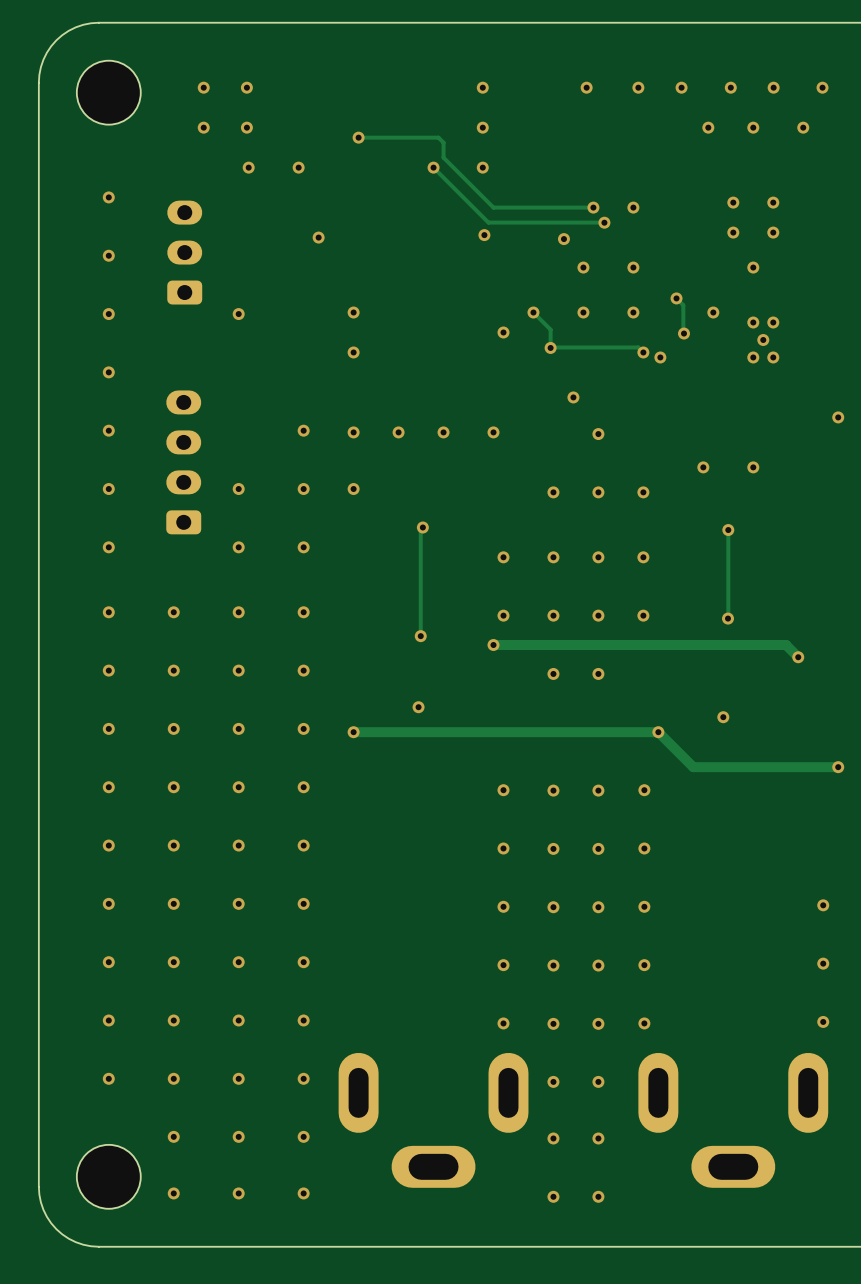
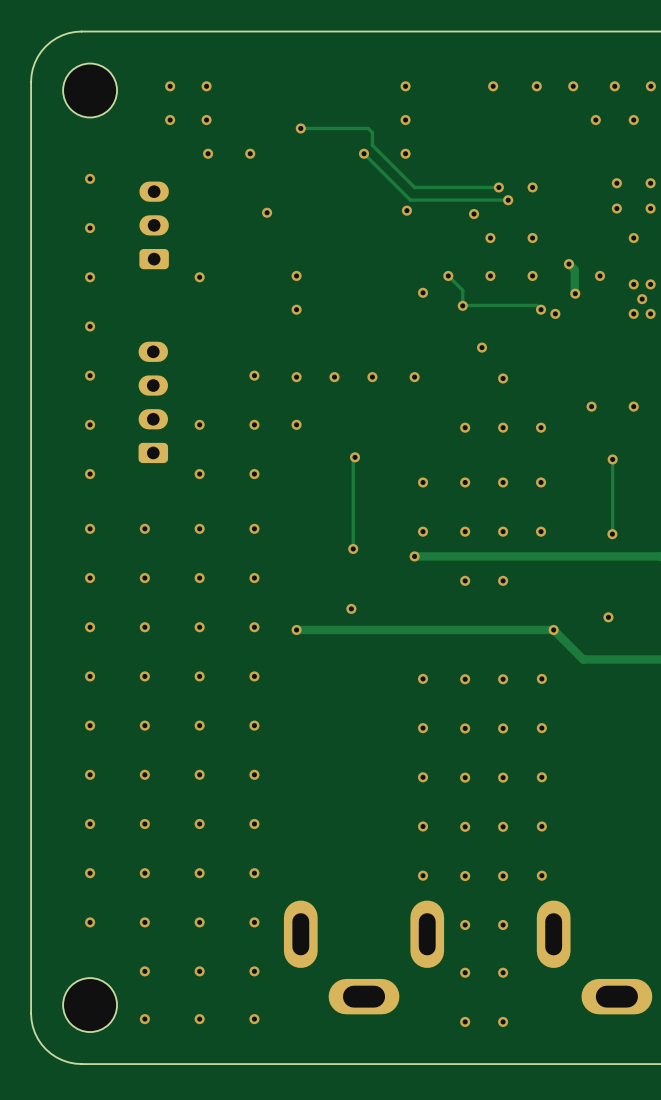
track width: thin (676, 298) (683, 305) (683, 332) -> thick (568, 264) (574, 269) (574, 293)

